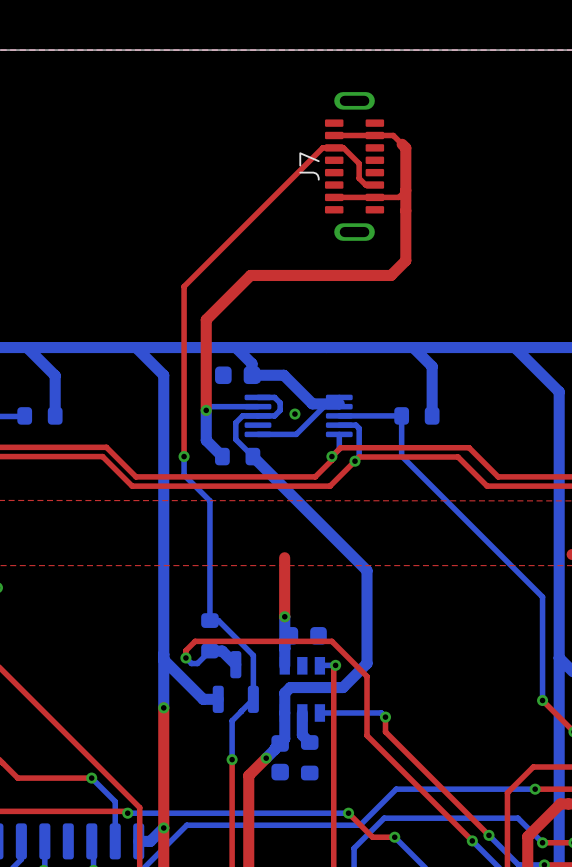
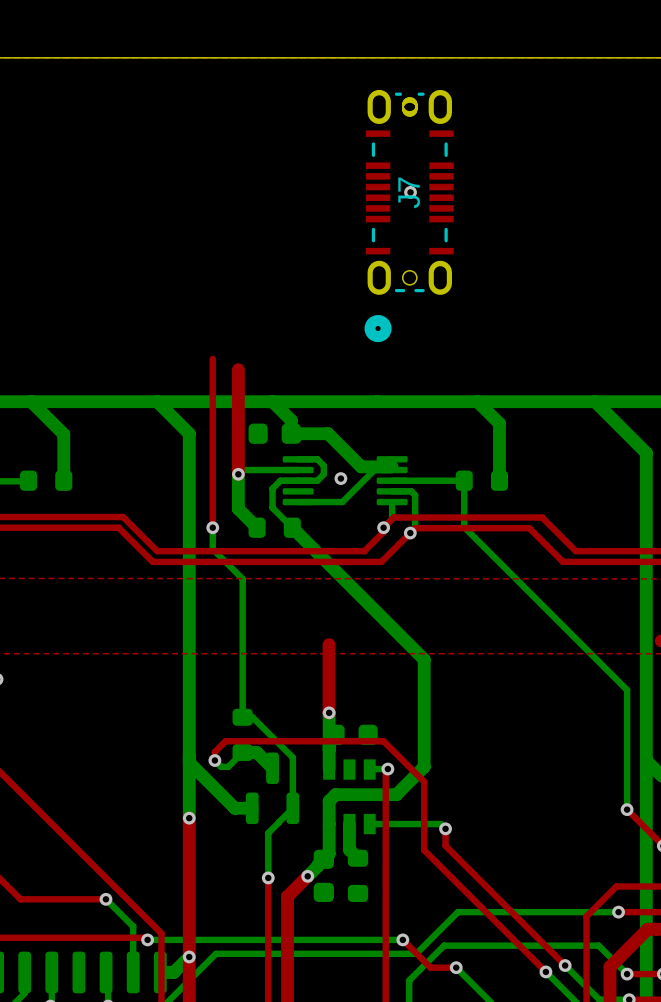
J7 footprint: [324, 92, 385, 241] -> [364, 89, 454, 343]
top track: (334, 135) (393, 135) (405, 147) (405, 260) (391, 275) (250, 275) (206, 319) -> none
J7 name position: J7 (309, 166) -> J7 (409, 192)
via: none -> (410, 192)
top track: (374, 185) (365, 185) (359, 178) (359, 163) (343, 147) (322, 147) (184, 286) (184, 310) -> none
top track: (405, 190) (398, 197) (334, 197) -> none

